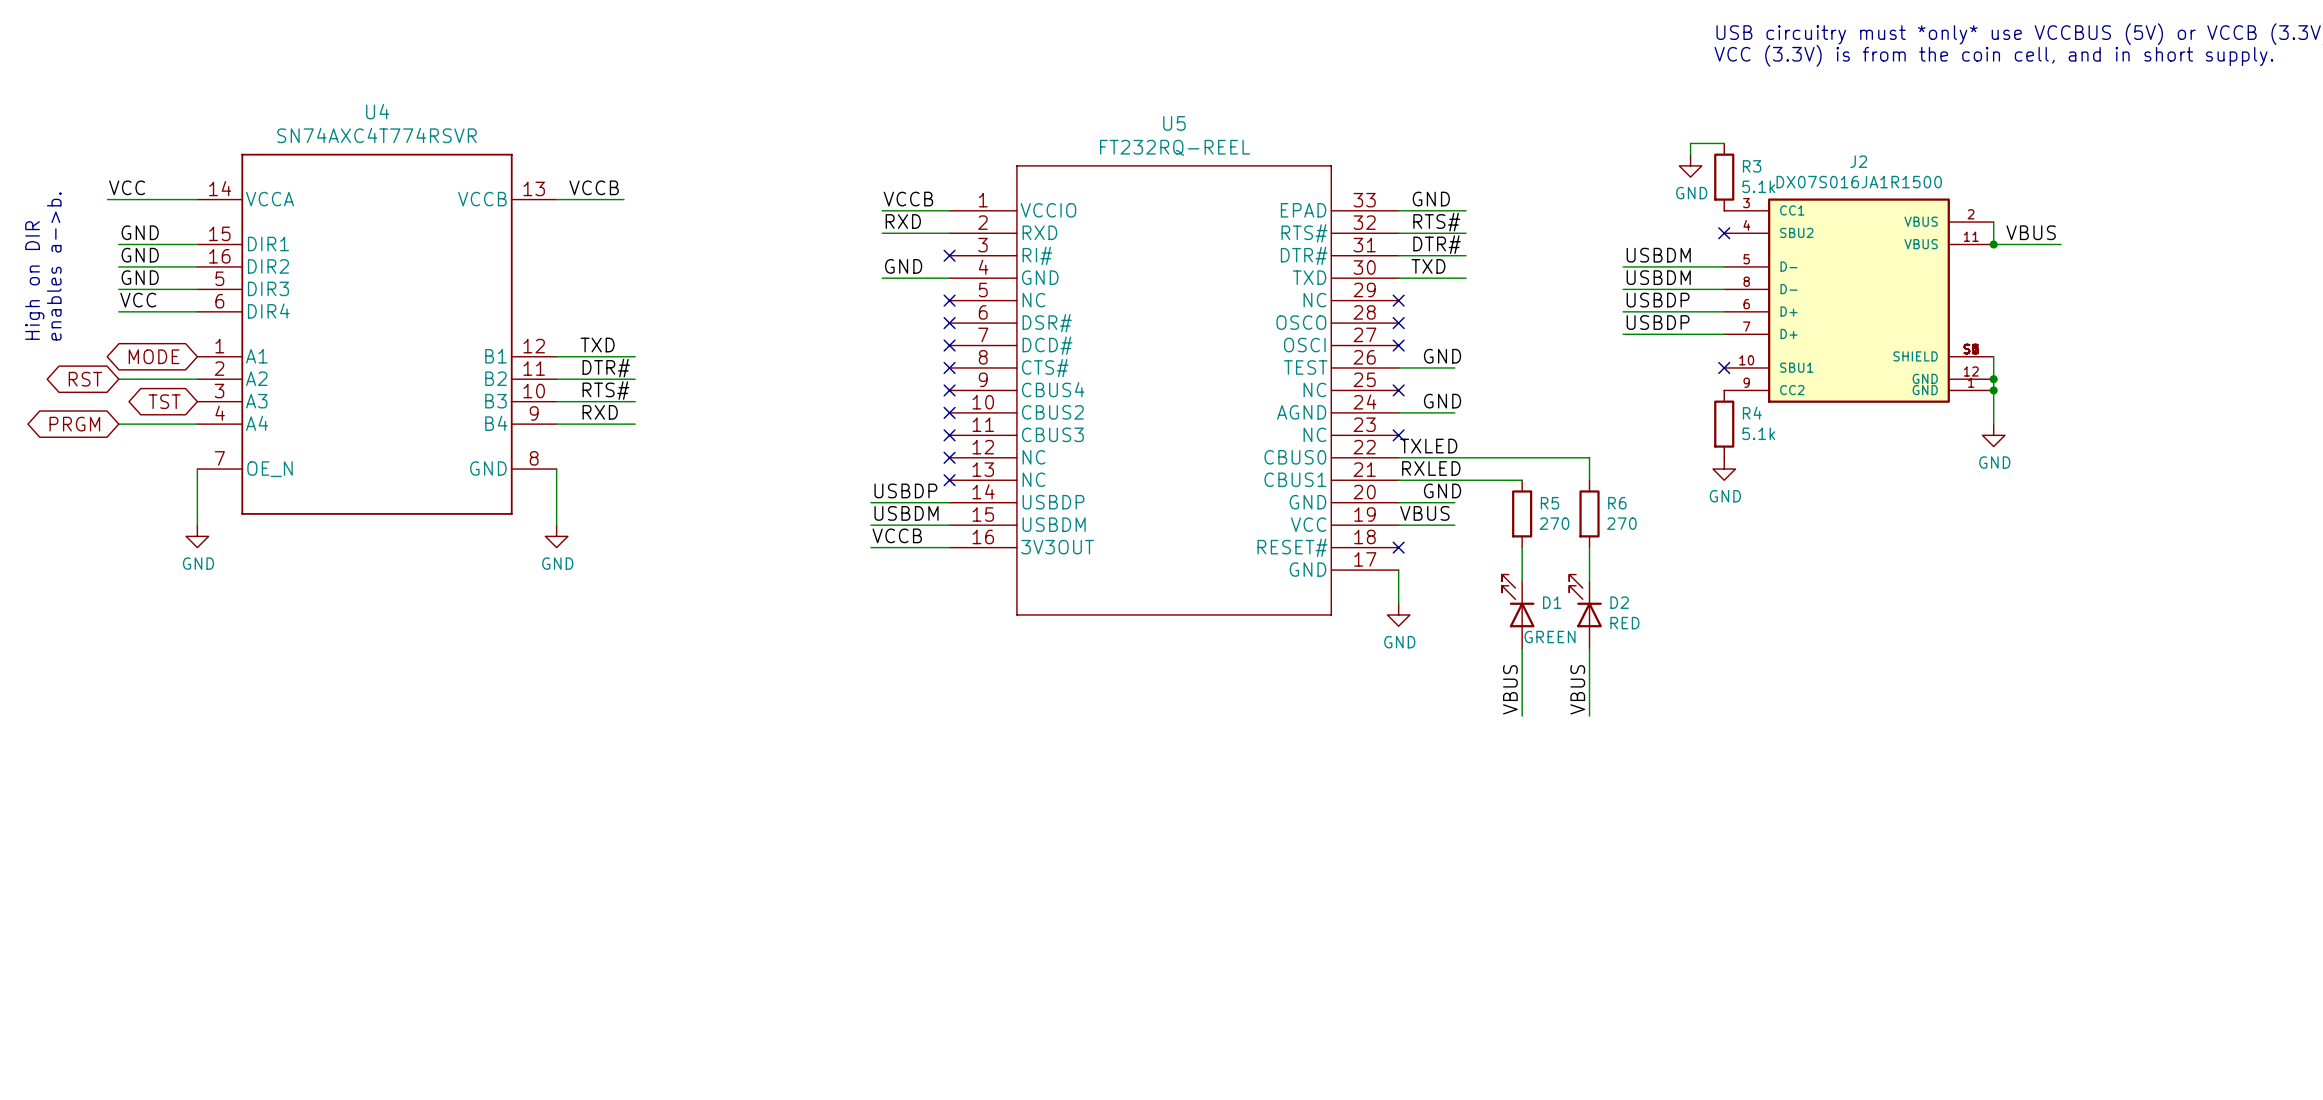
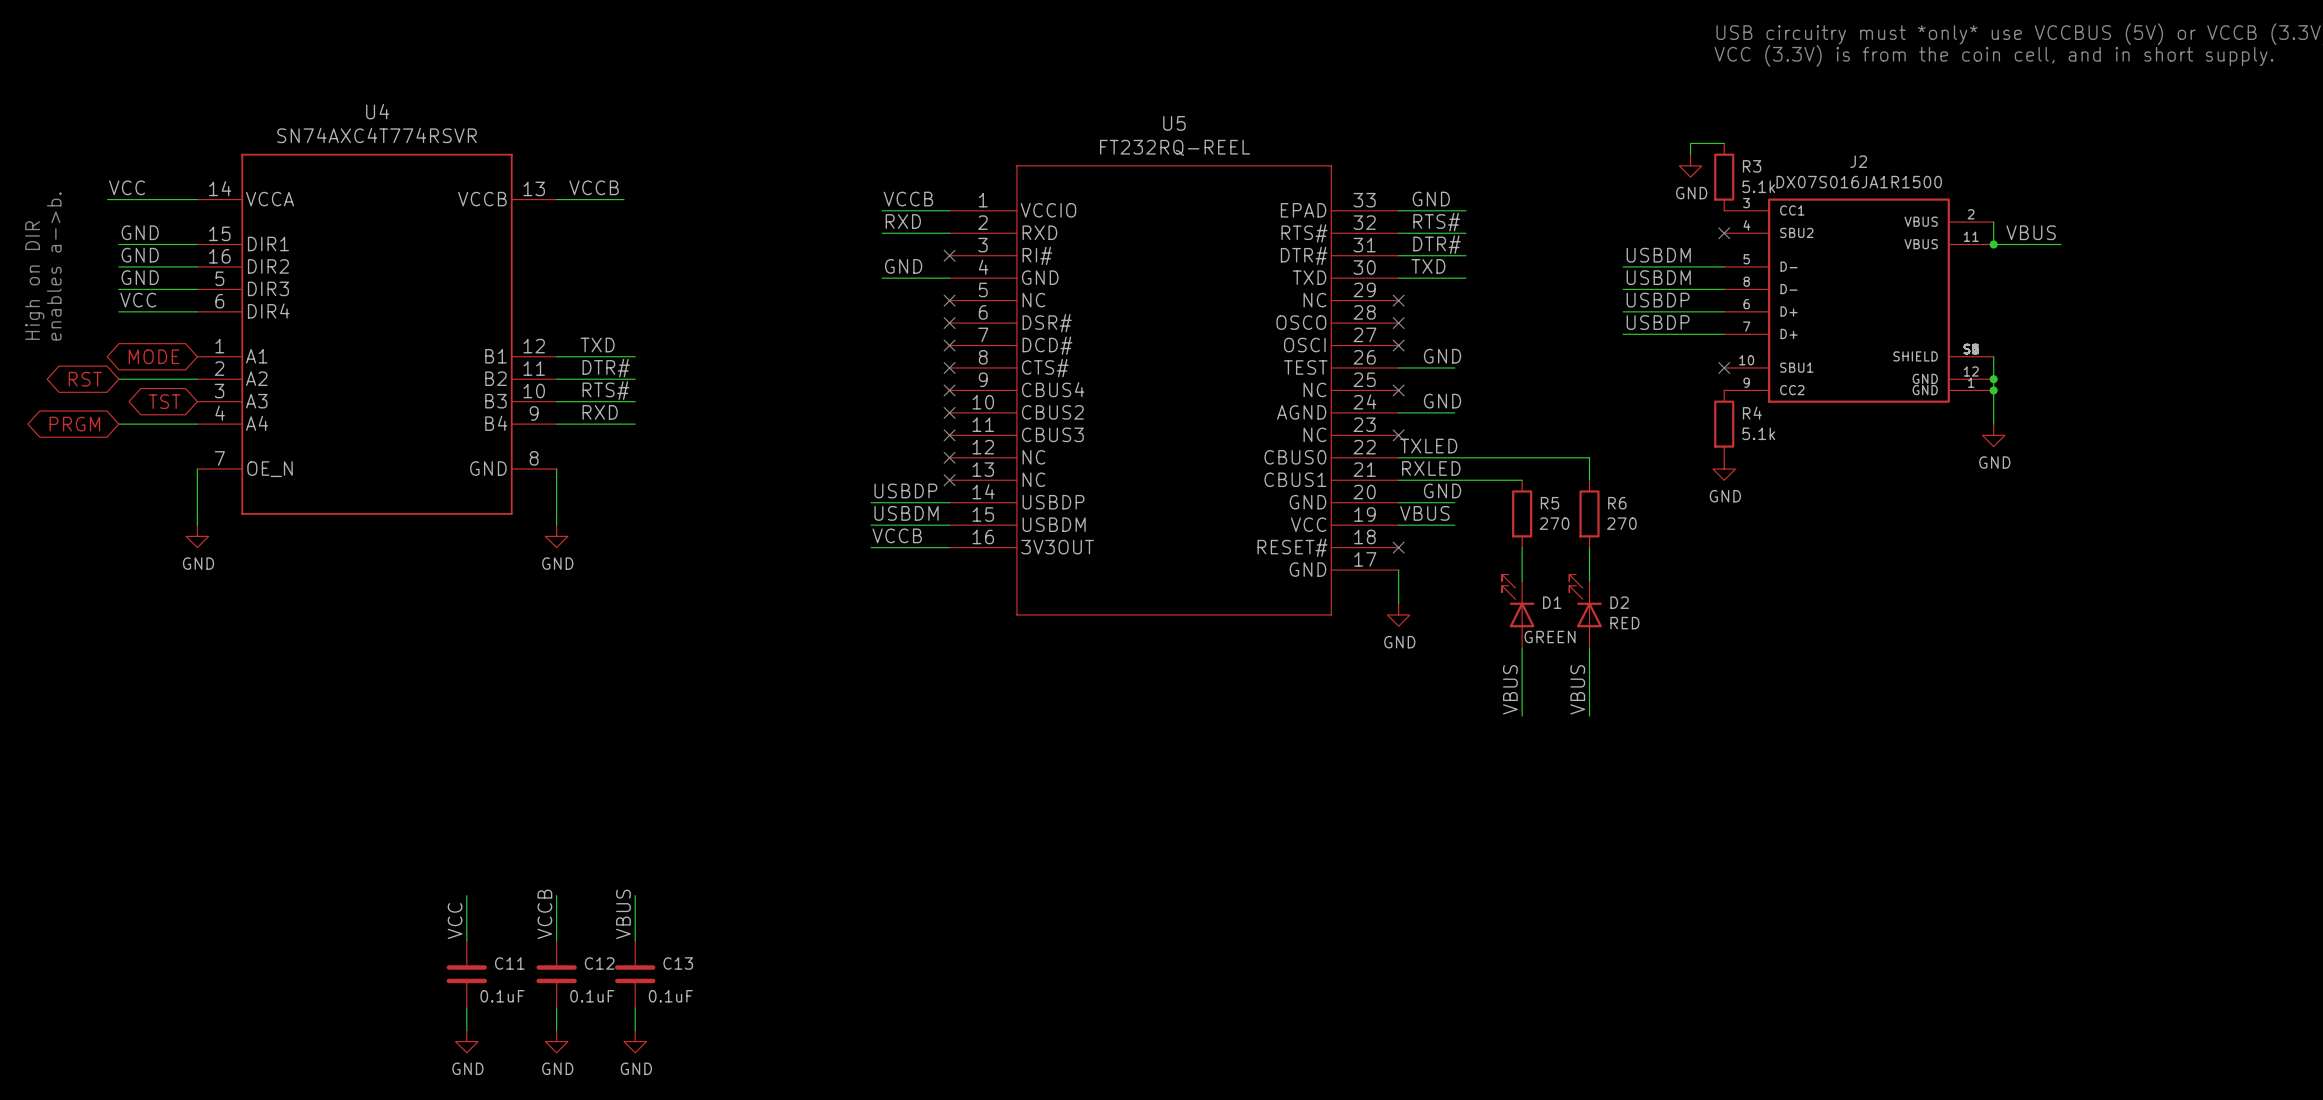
wire: none -> (466, 895) (466, 940)
wire: none -> (556, 895) (556, 940)
wire: none -> (635, 895) (635, 940)
label: none -> VCCB (544, 914)
label: none -> VBUS (623, 914)
label: none -> VCC (455, 921)
C11: none -> 0.1uF (466, 974)
C12: none -> 0.1uF (556, 974)
C13: none -> 0.1uF (635, 974)
wire: none -> (466, 1007) (466, 1030)
wire: none -> (556, 1007) (556, 1030)
wire: none -> (635, 1007) (635, 1030)
power symbol: none -> GND (466, 1041)
power symbol: none -> GND (556, 1041)
power symbol: none -> GND (635, 1041)

